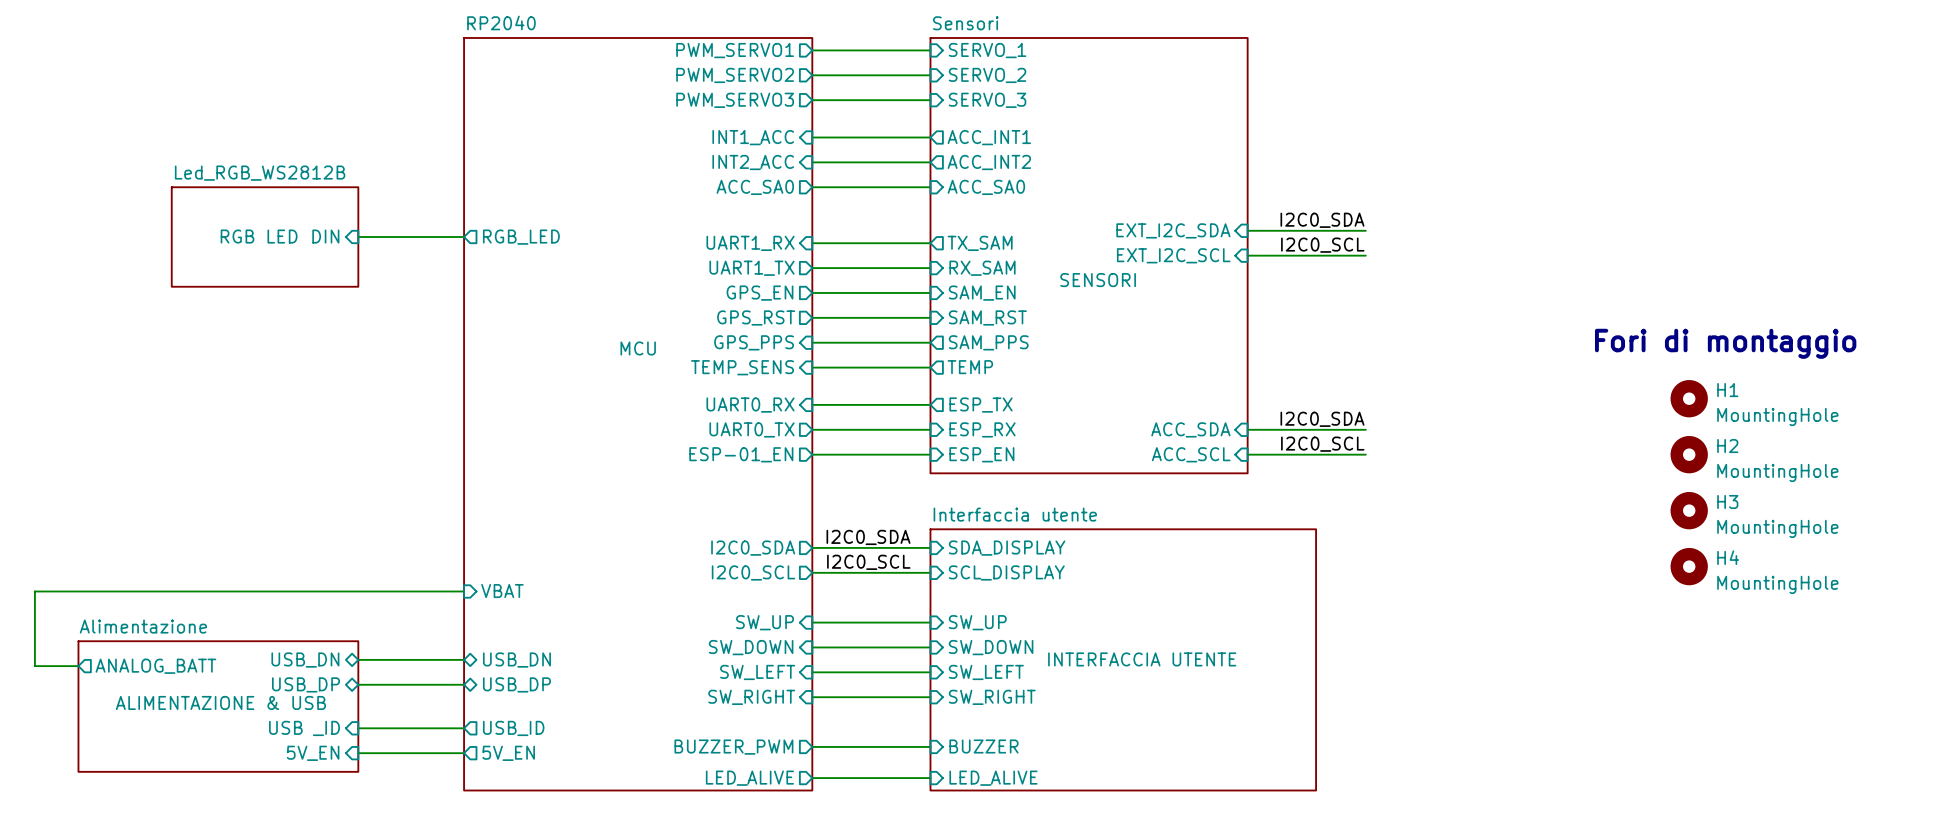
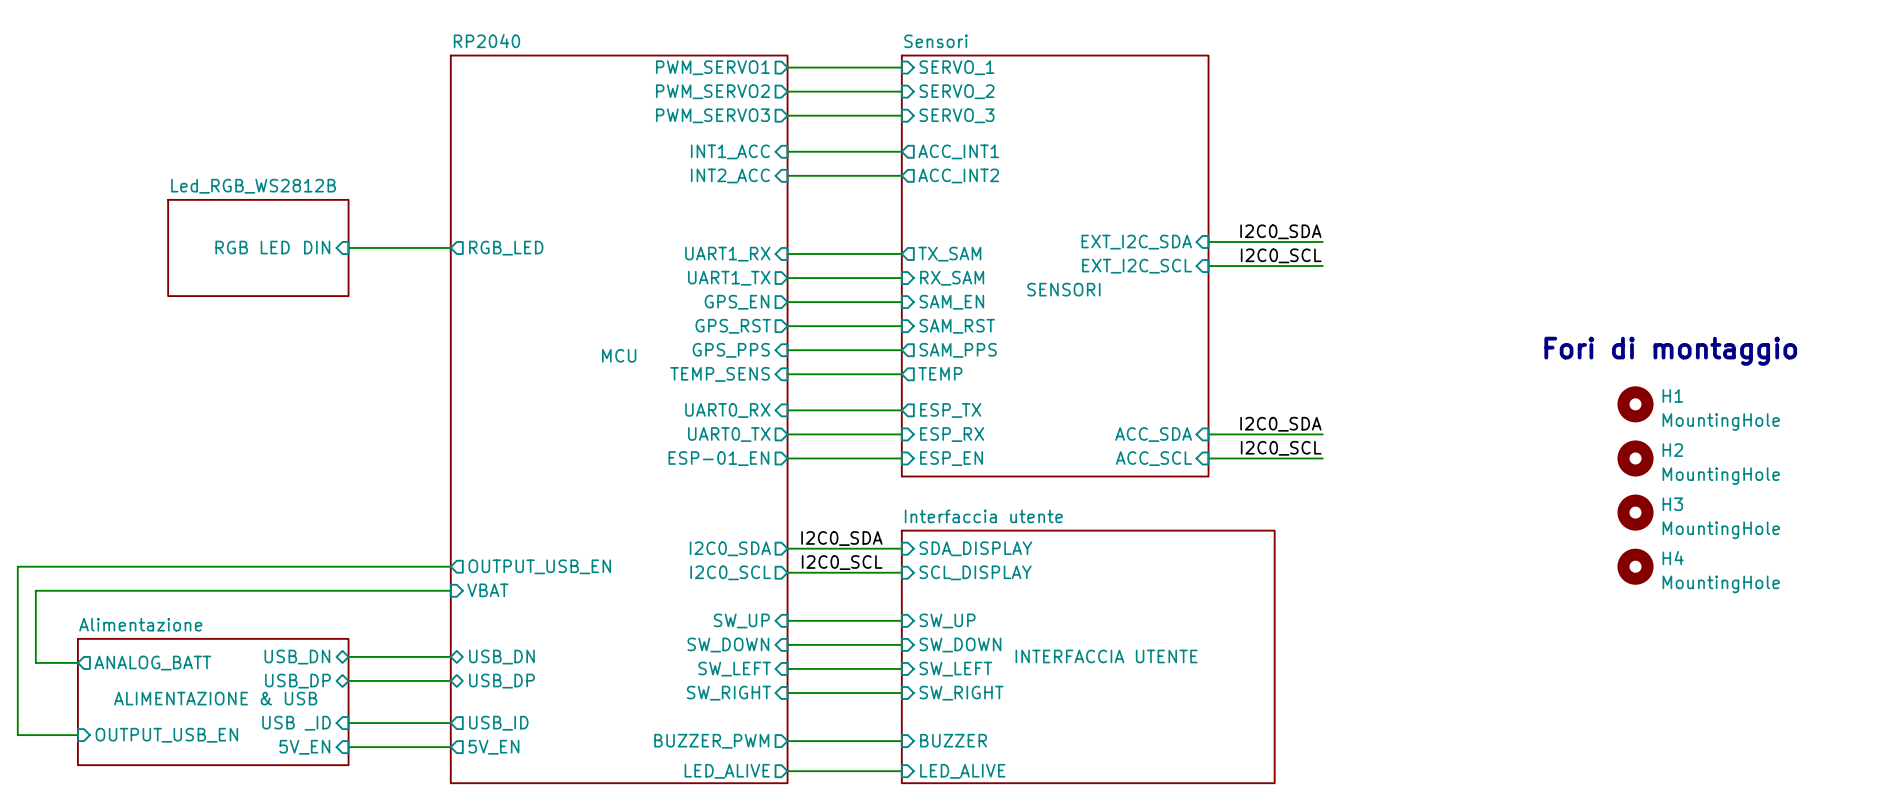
sheet pin: ACC_SA0 (755, 187) -> none
wire: (812, 187) (930, 187) -> none
sheet pin: ACC_SA0 (986, 187) -> none
wire: none -> (450, 566) (17, 566) (17, 735) (77, 735)
sheet pin: none -> OUTPUT_USB_EN (539, 566)
sheet pin: none -> OUTPUT_USB_EN (166, 735)

